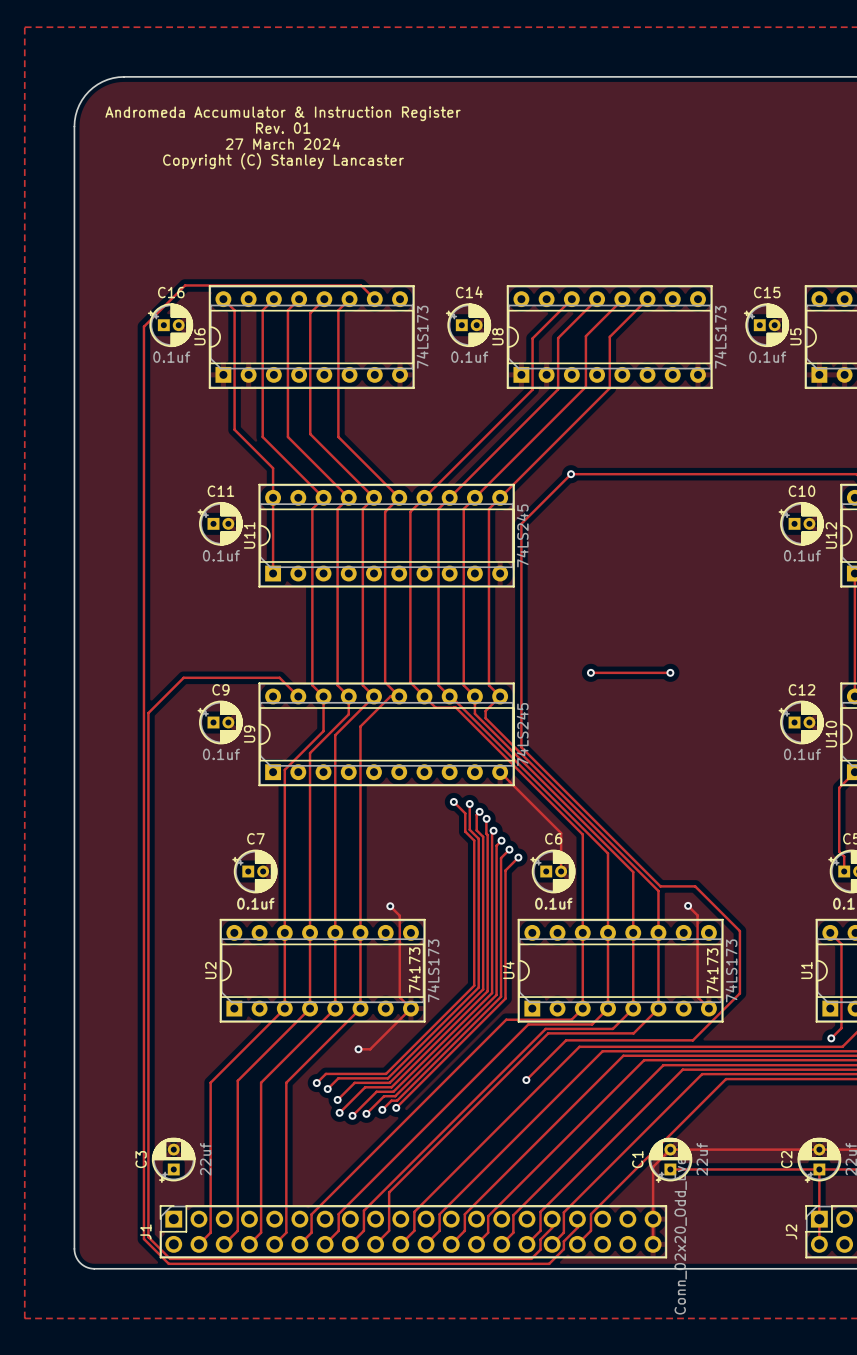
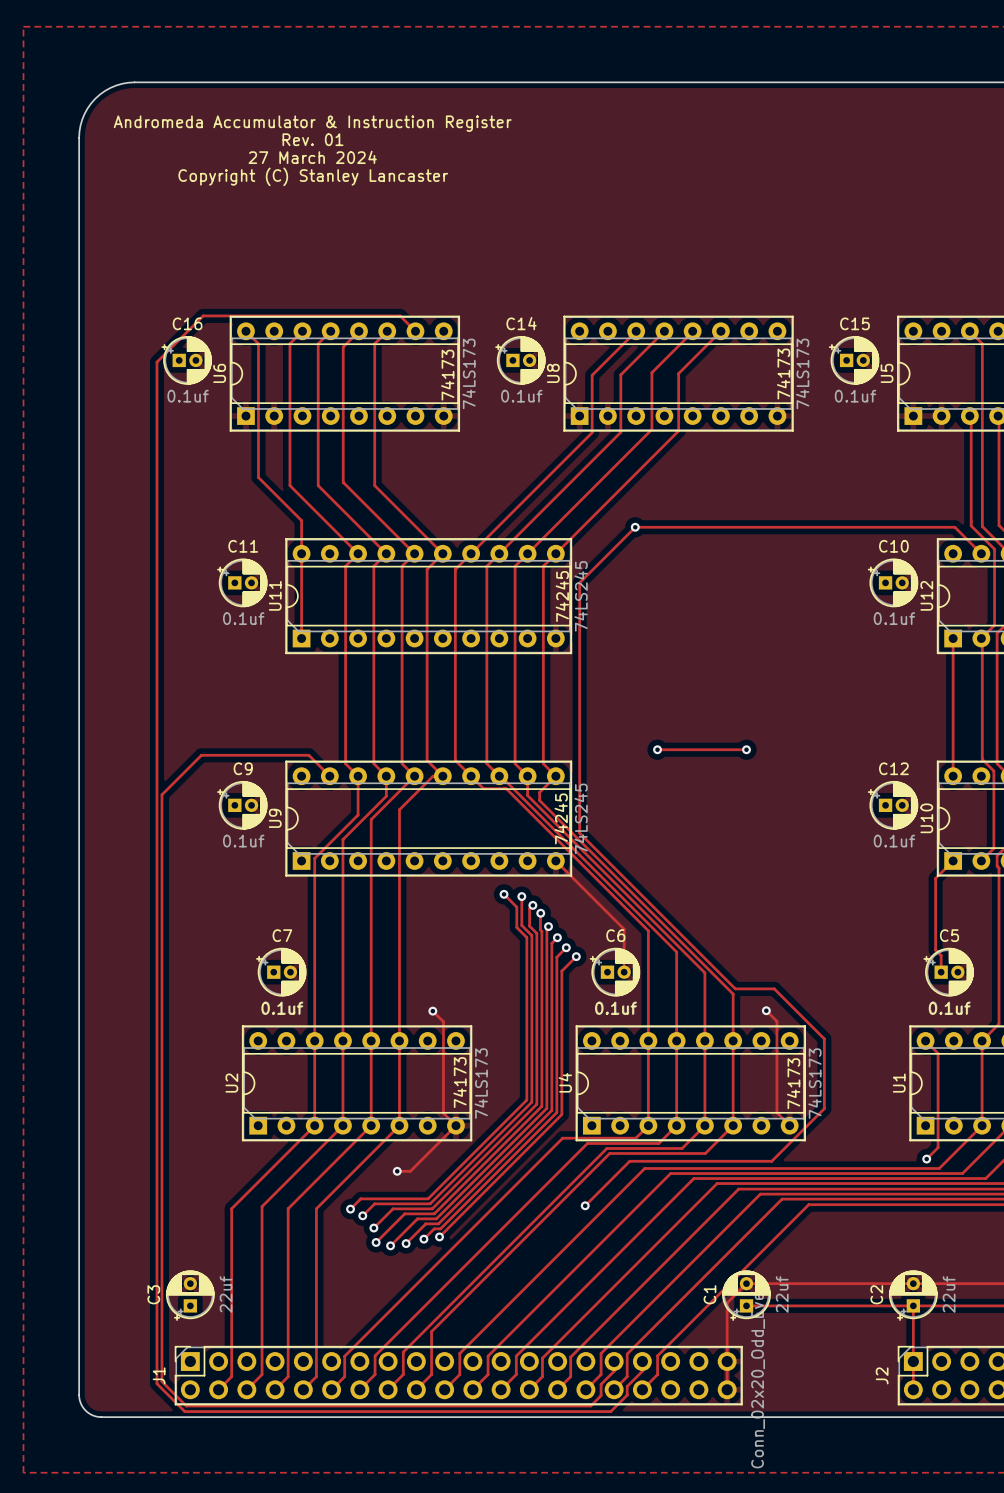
text: none -> 74173 (783, 374)
text: none -> 74173 (447, 375)
text: none -> 74245 (562, 596)
text: none -> 74245 (561, 818)

